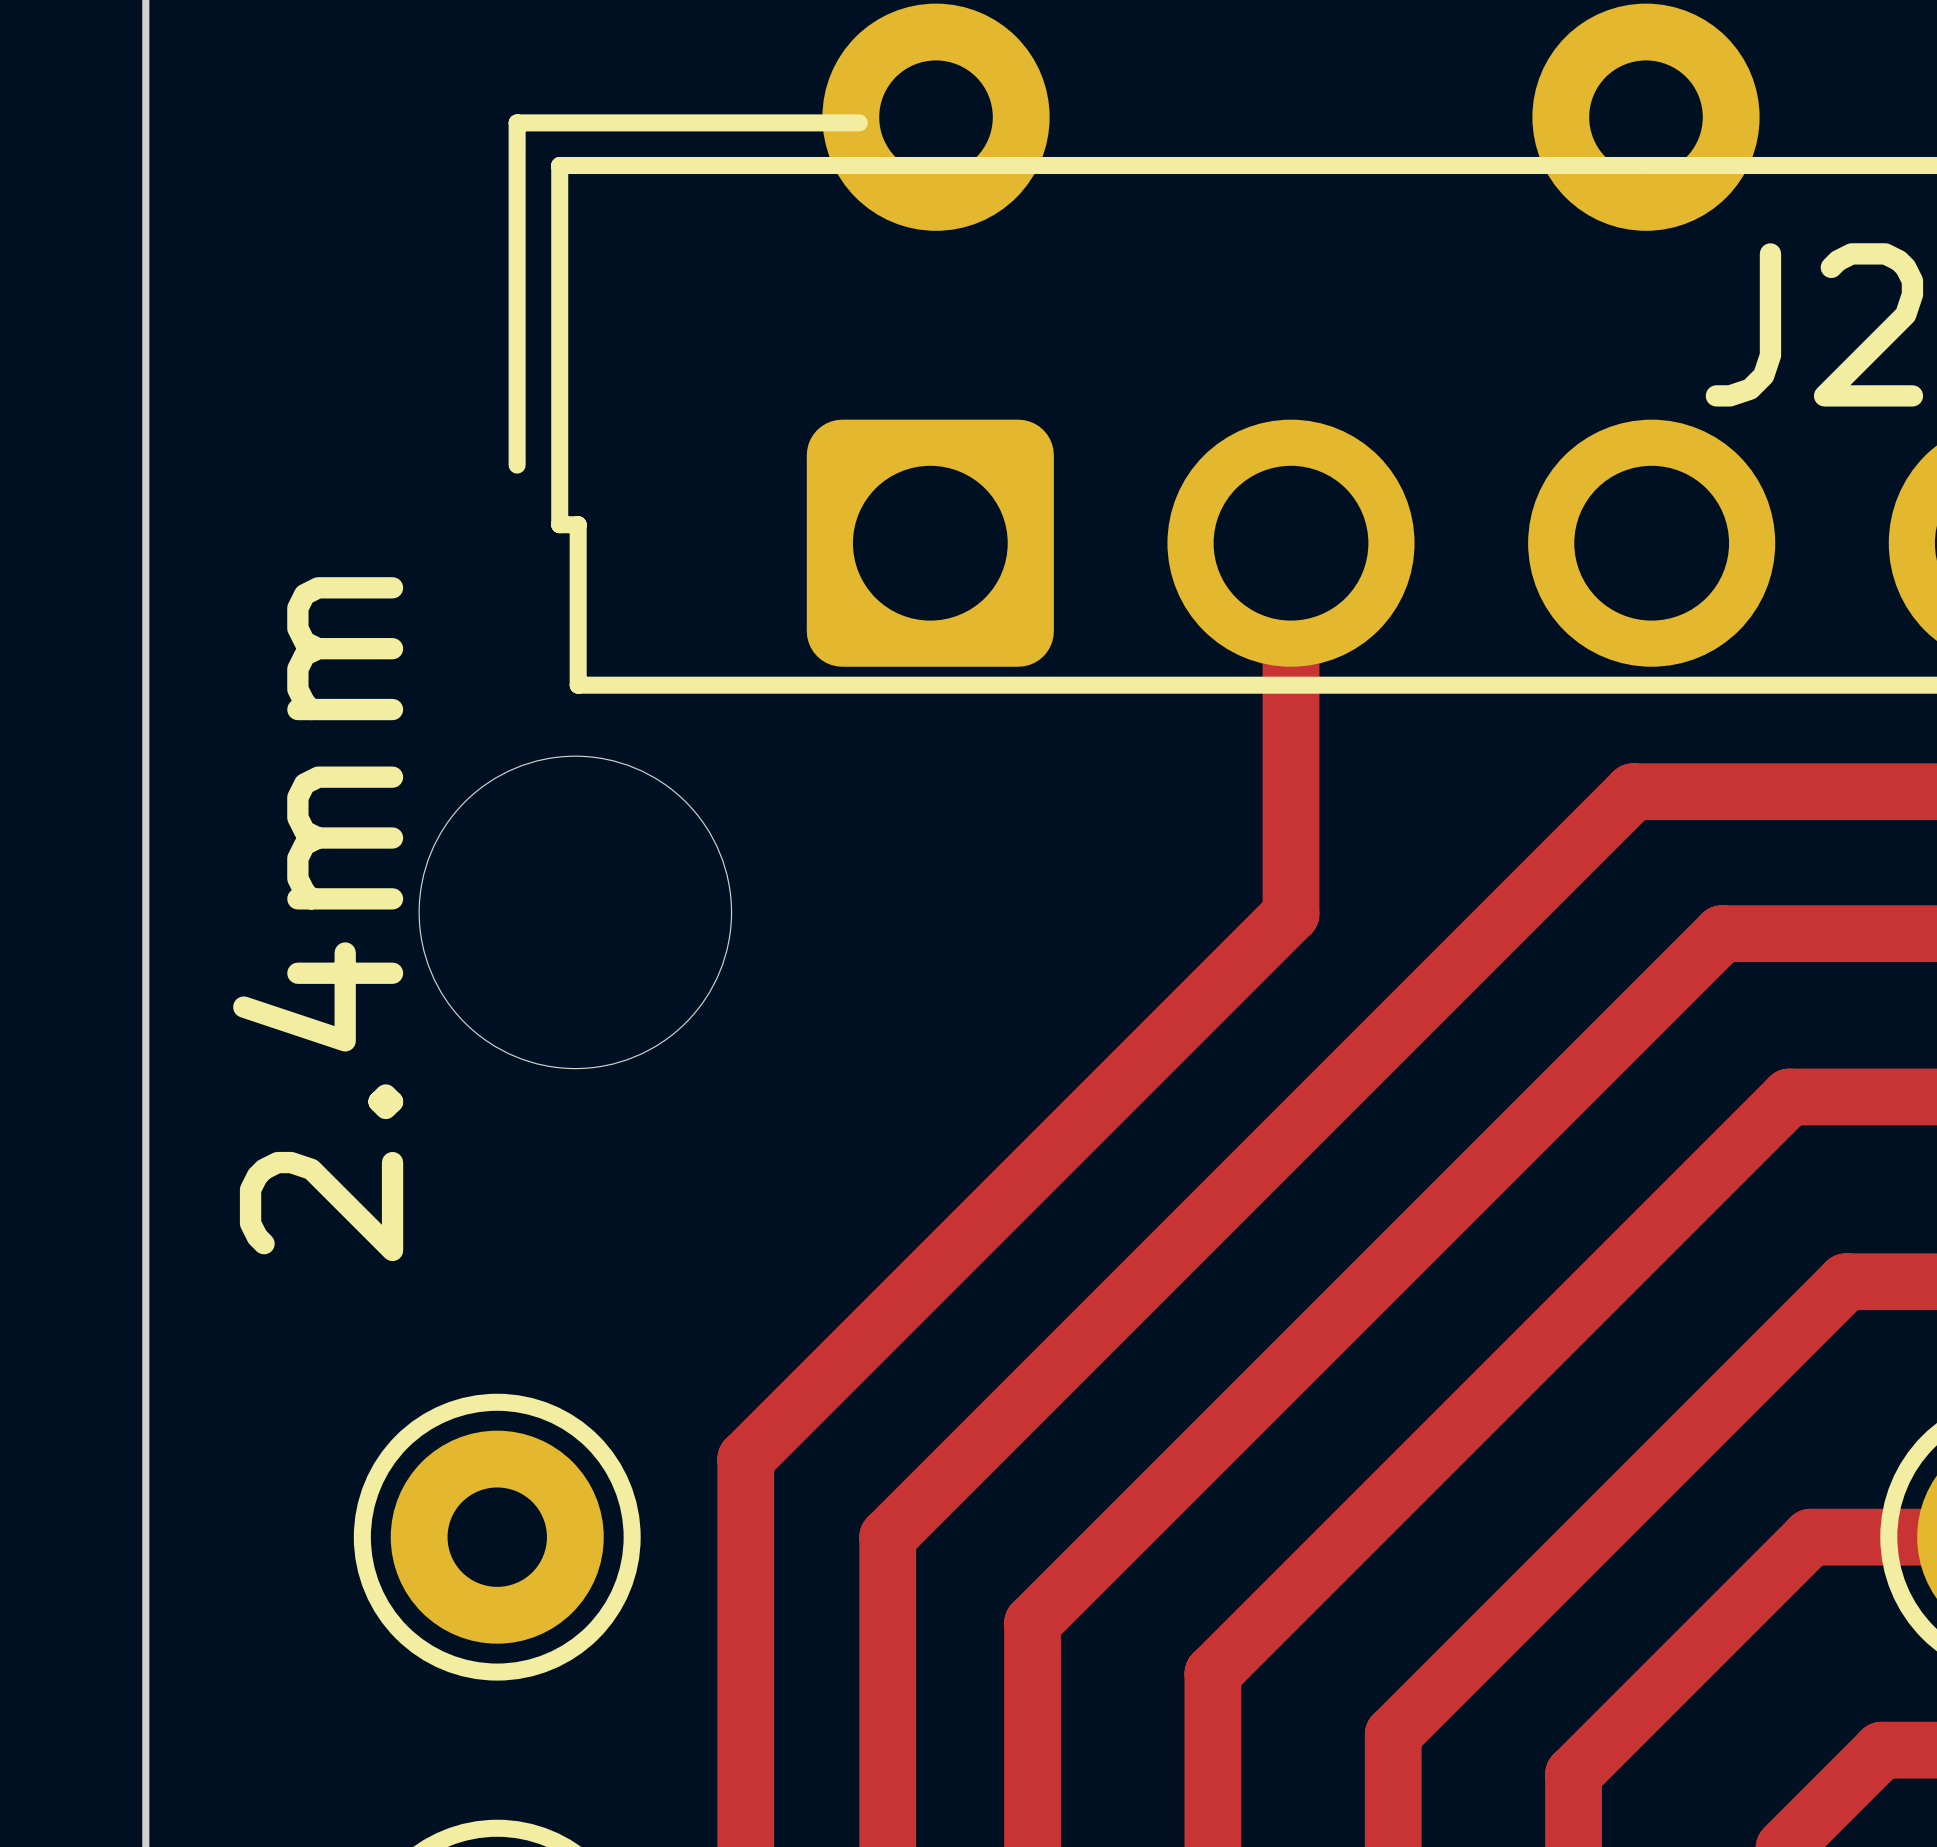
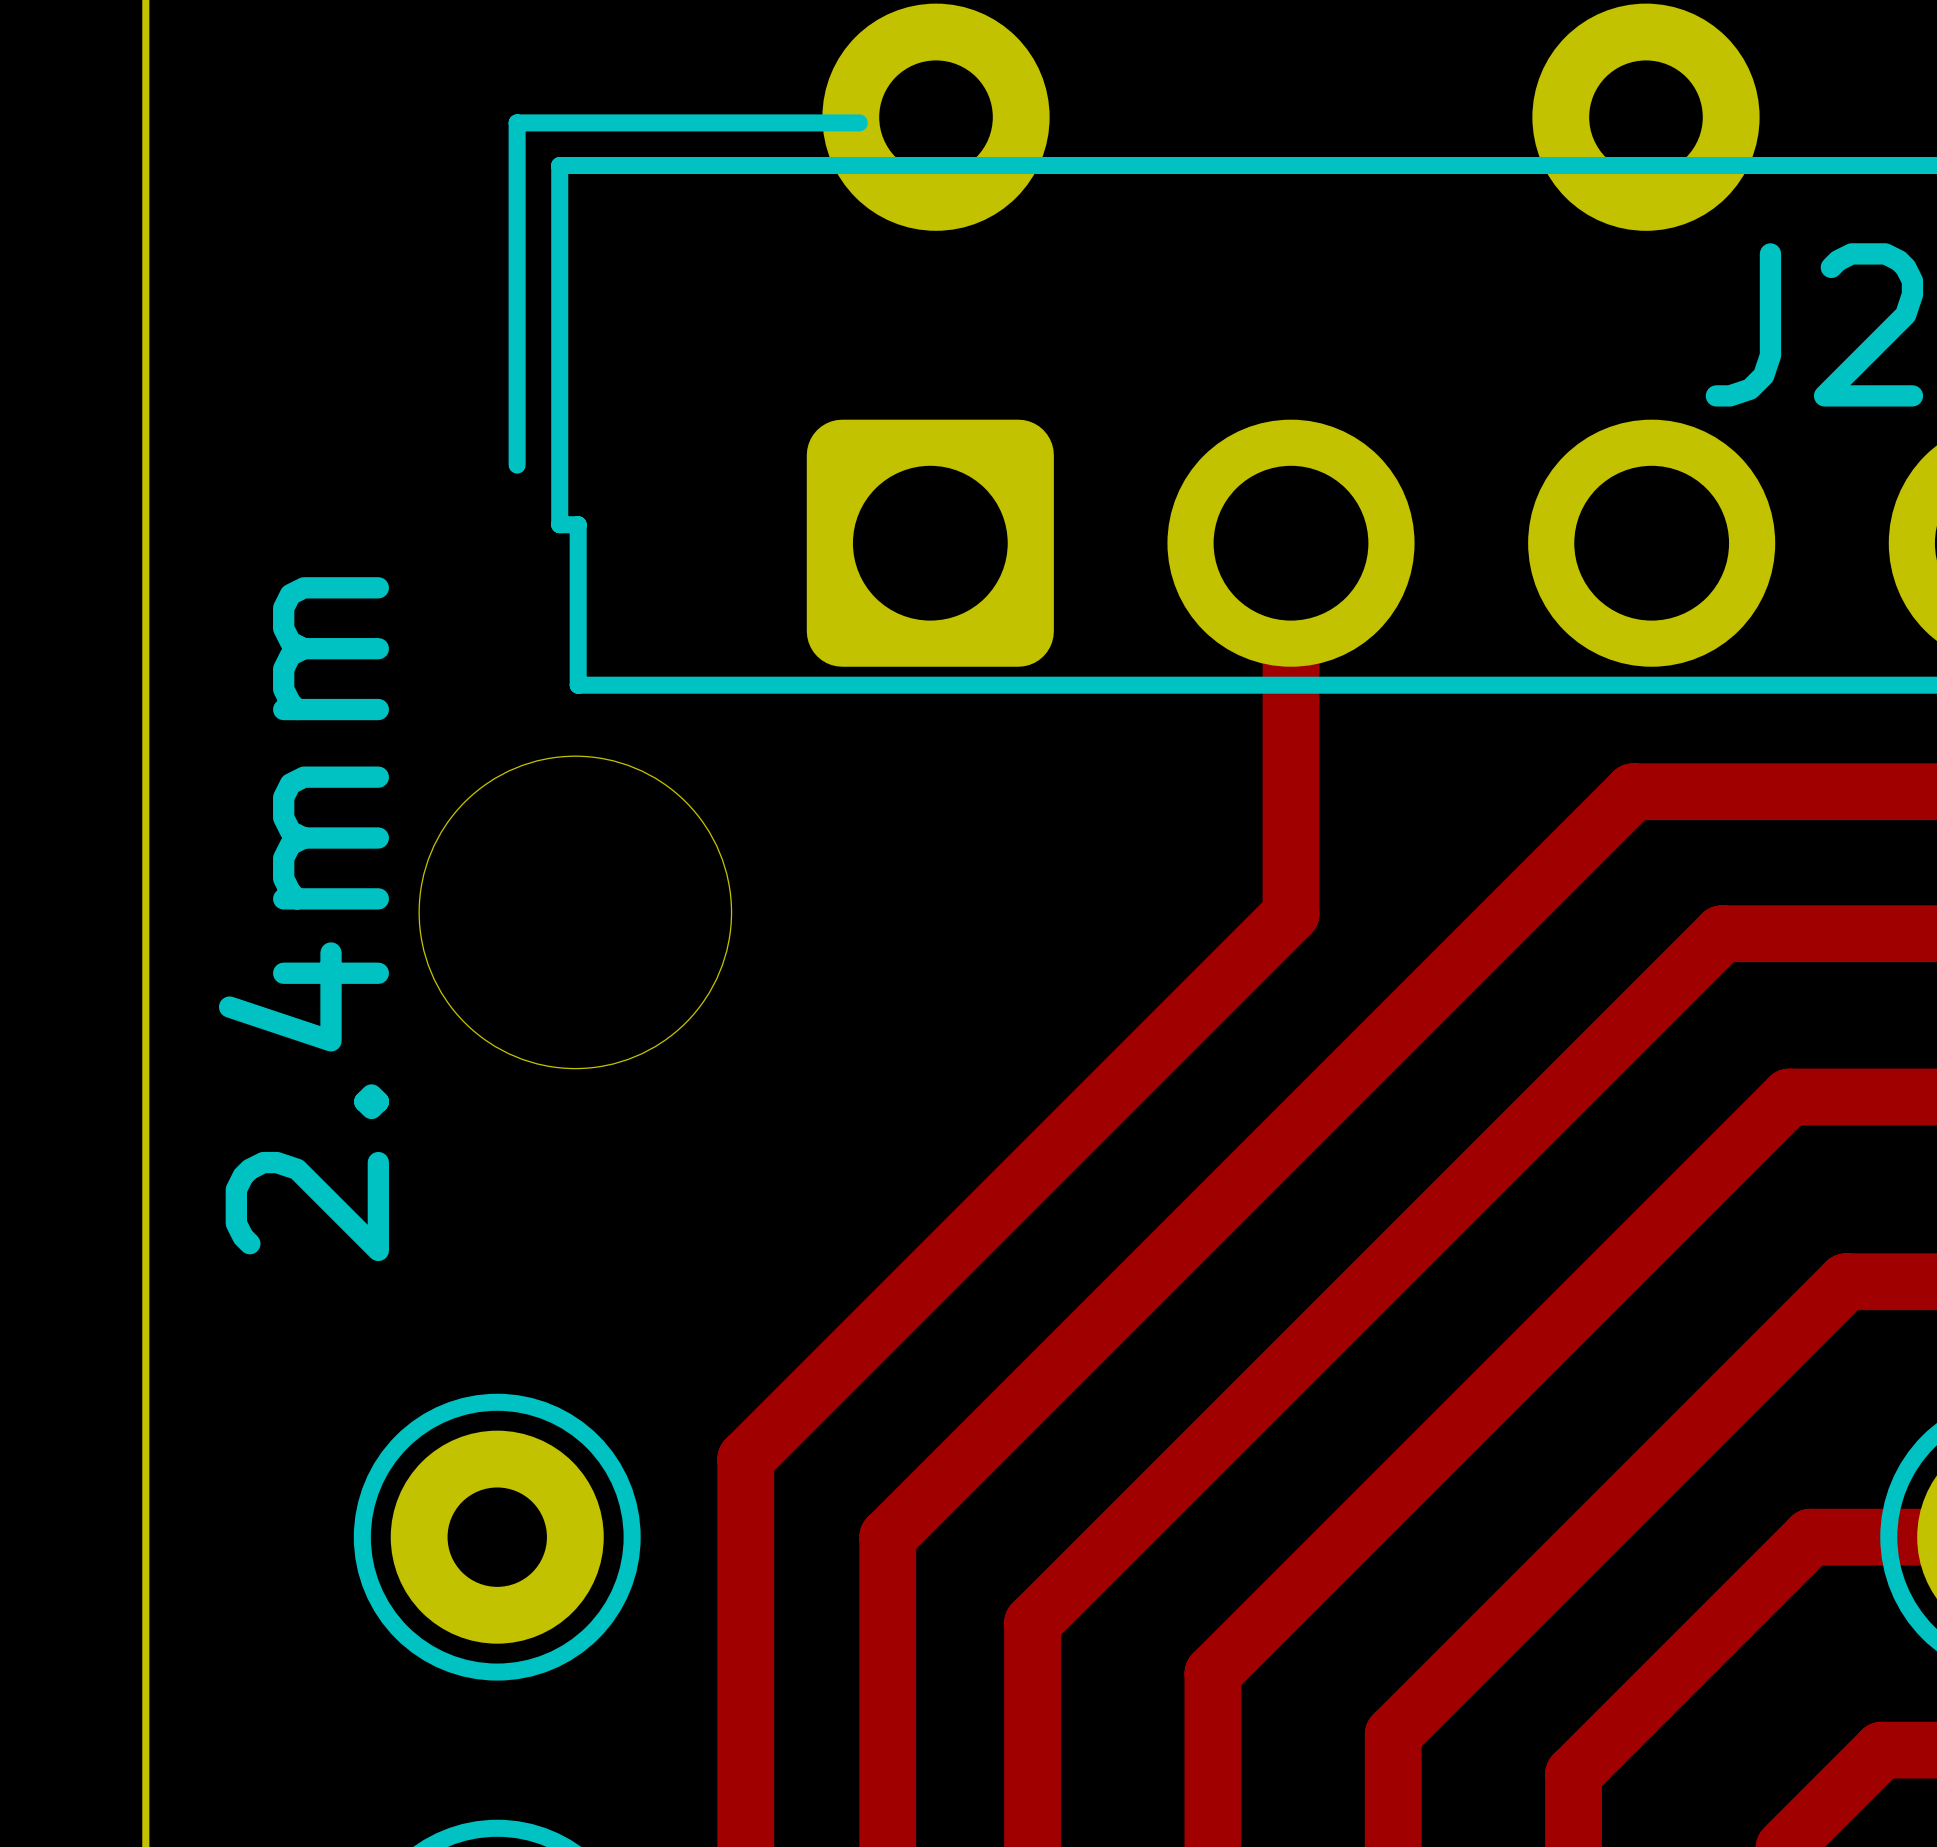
2.4mm name position: 2.4mm (318, 919) -> 2.4mm (303, 919)

